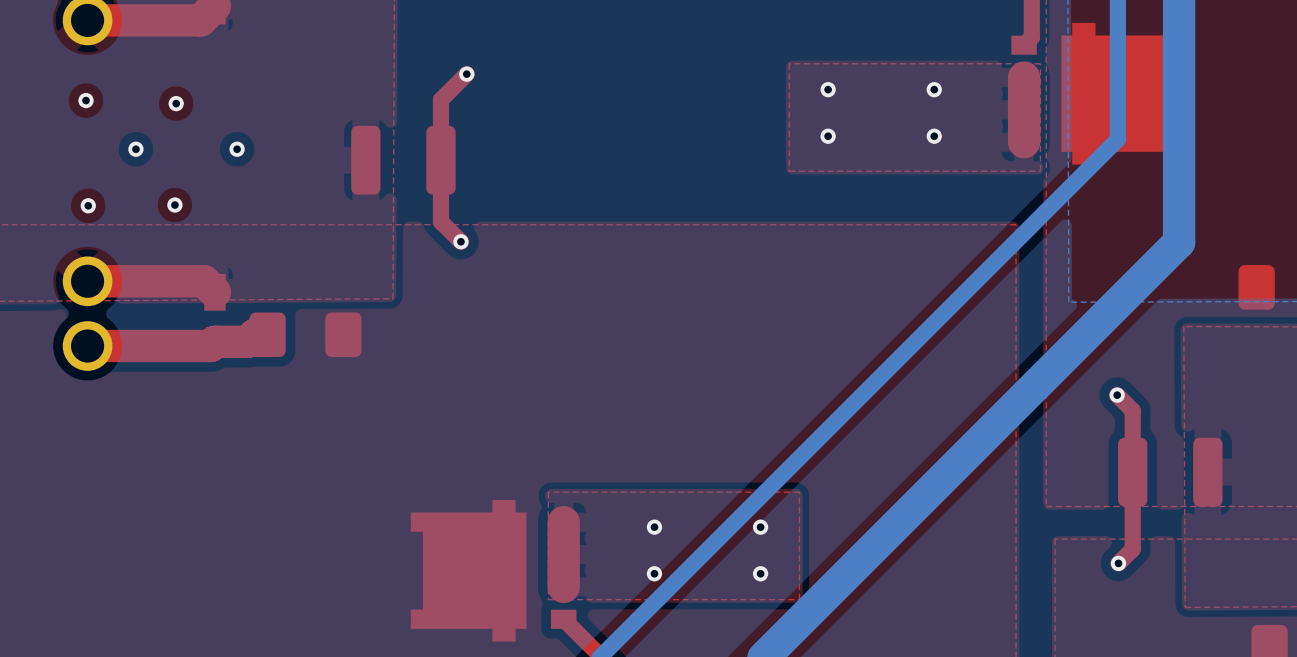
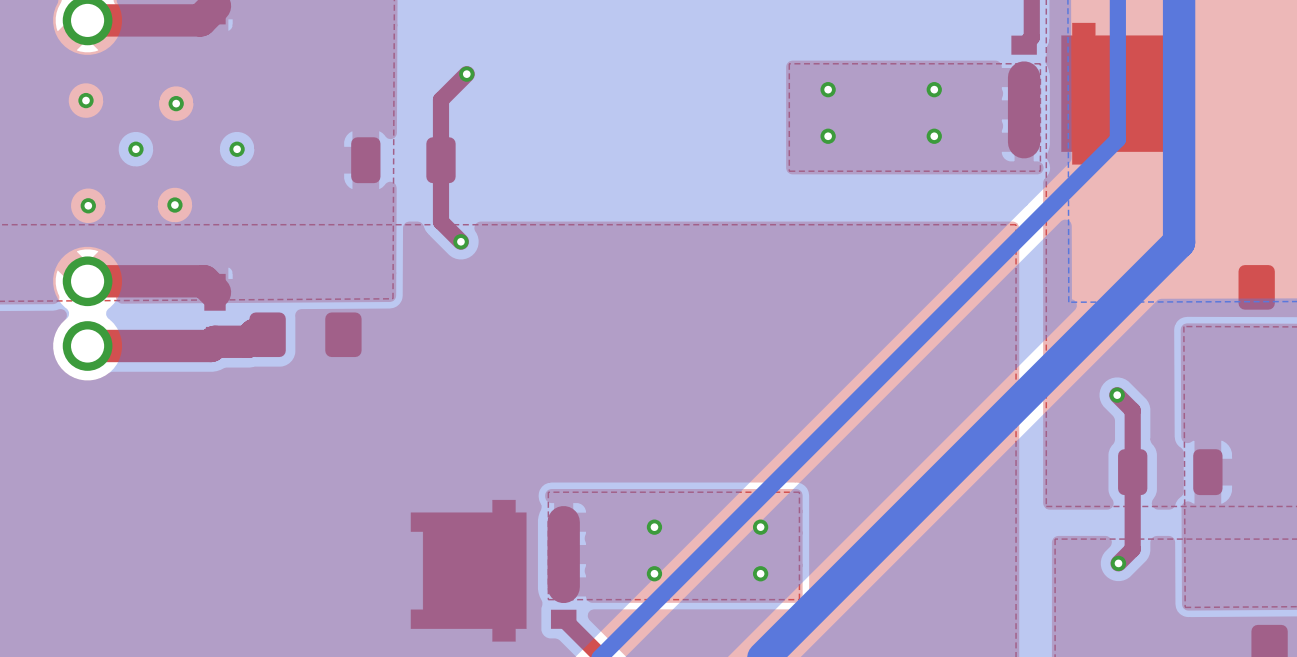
part footprint: [351, 125, 456, 195] -> [351, 137, 456, 184]
part footprint: [1118, 437, 1223, 507] -> [1118, 449, 1223, 496]

